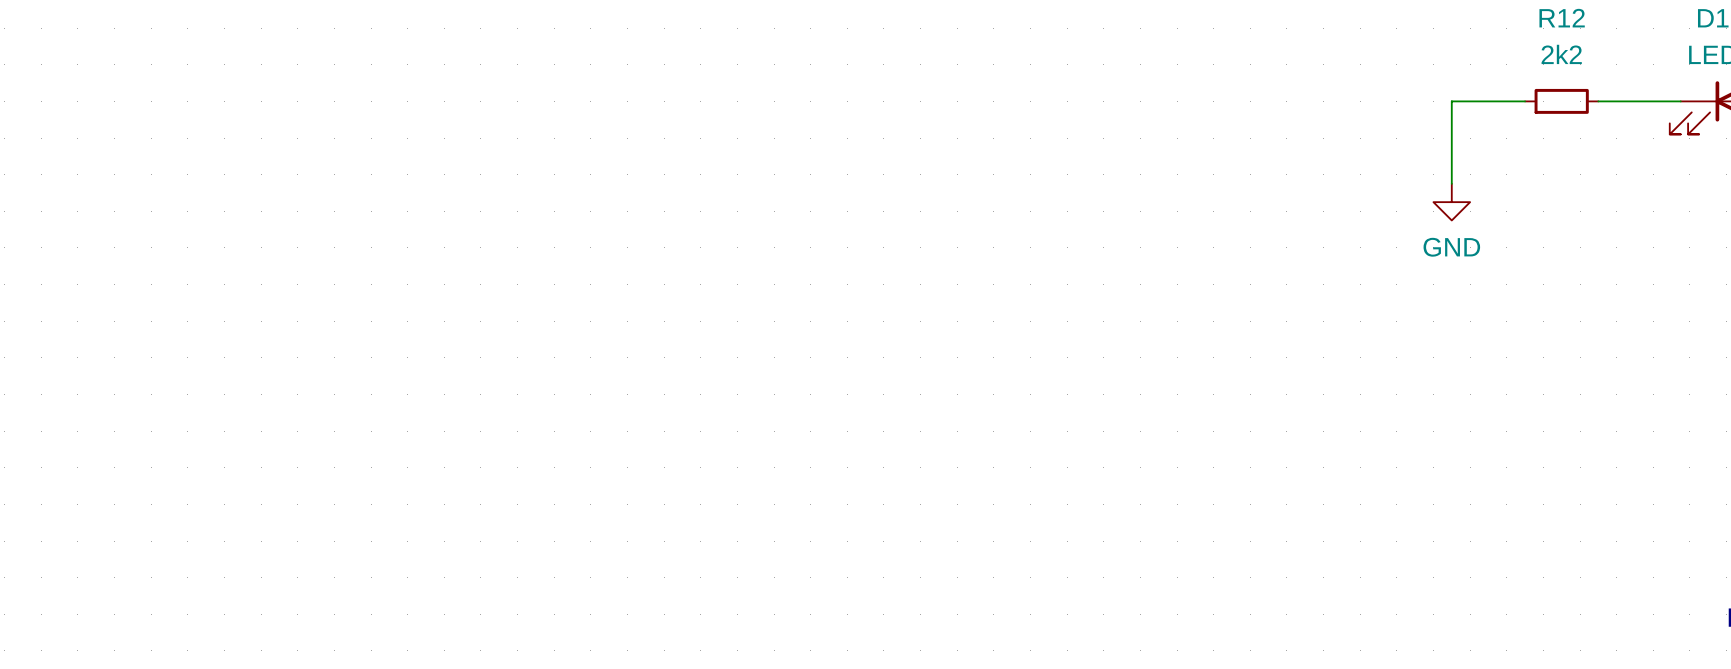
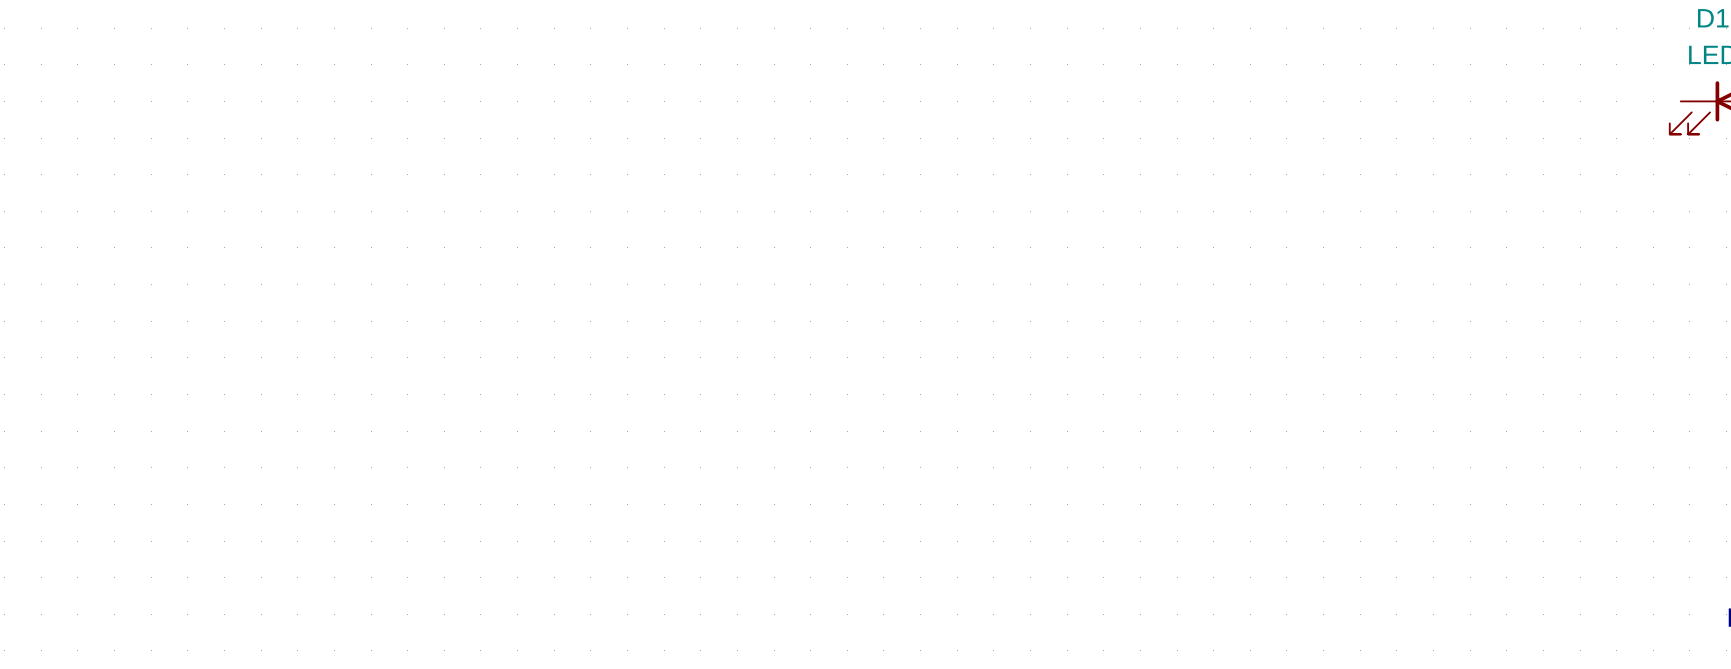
wire: (1525, 101) (1451, 101) (1451, 183) -> none
R12: 2k2 (1561, 101) -> none
wire: (1598, 101) (1680, 101) -> none
power symbol: GND (1451, 202) -> none

